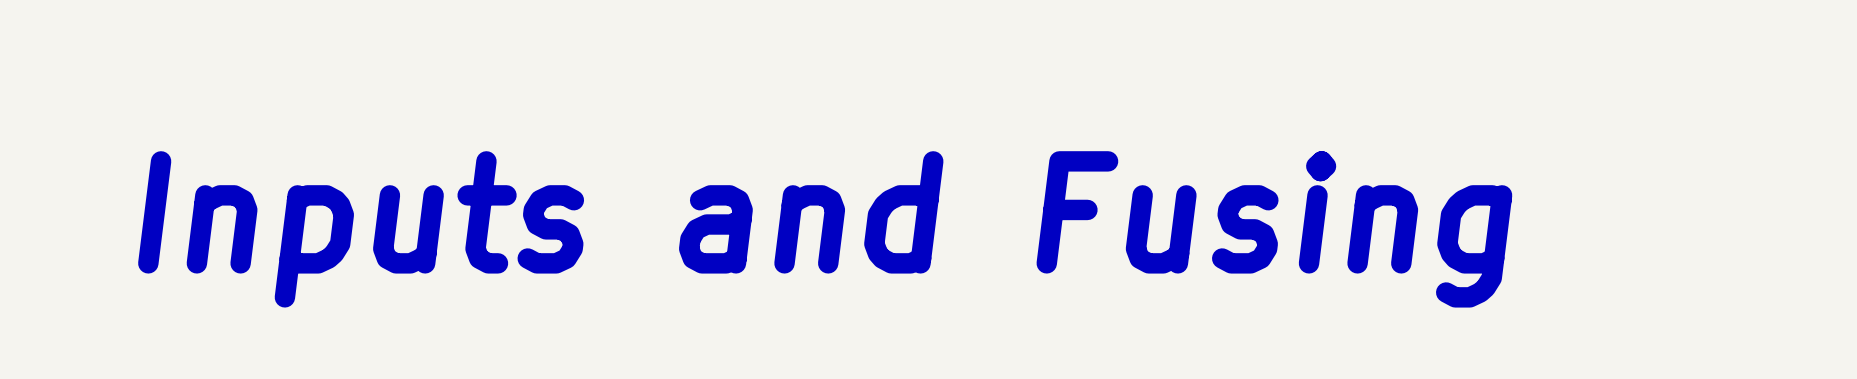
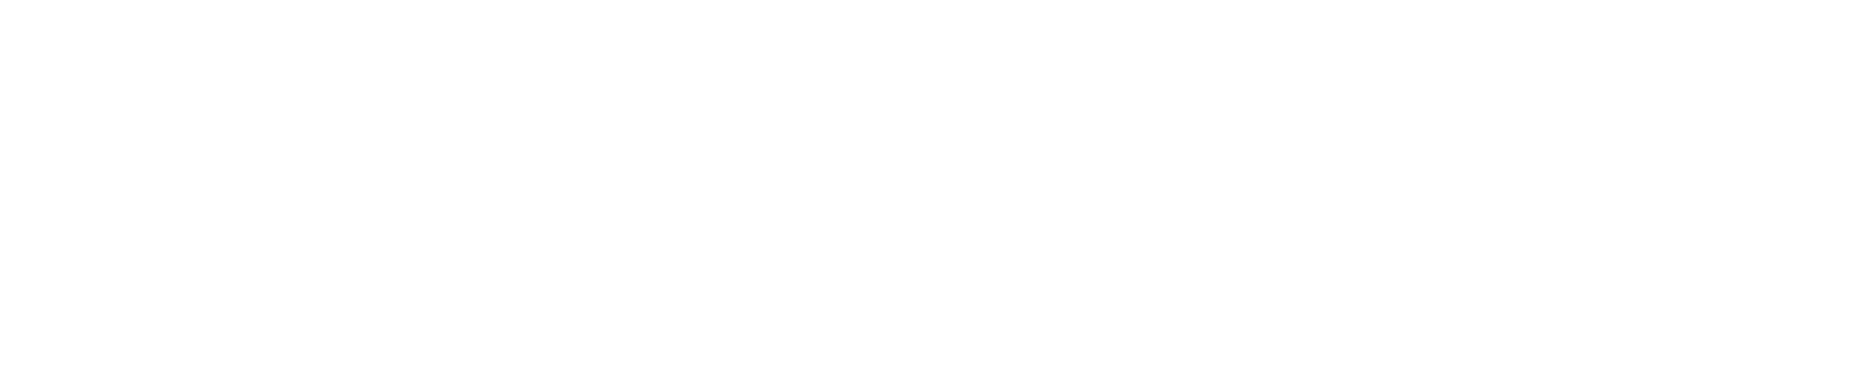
text: Inputs and Fusing (825, 229) -> none

